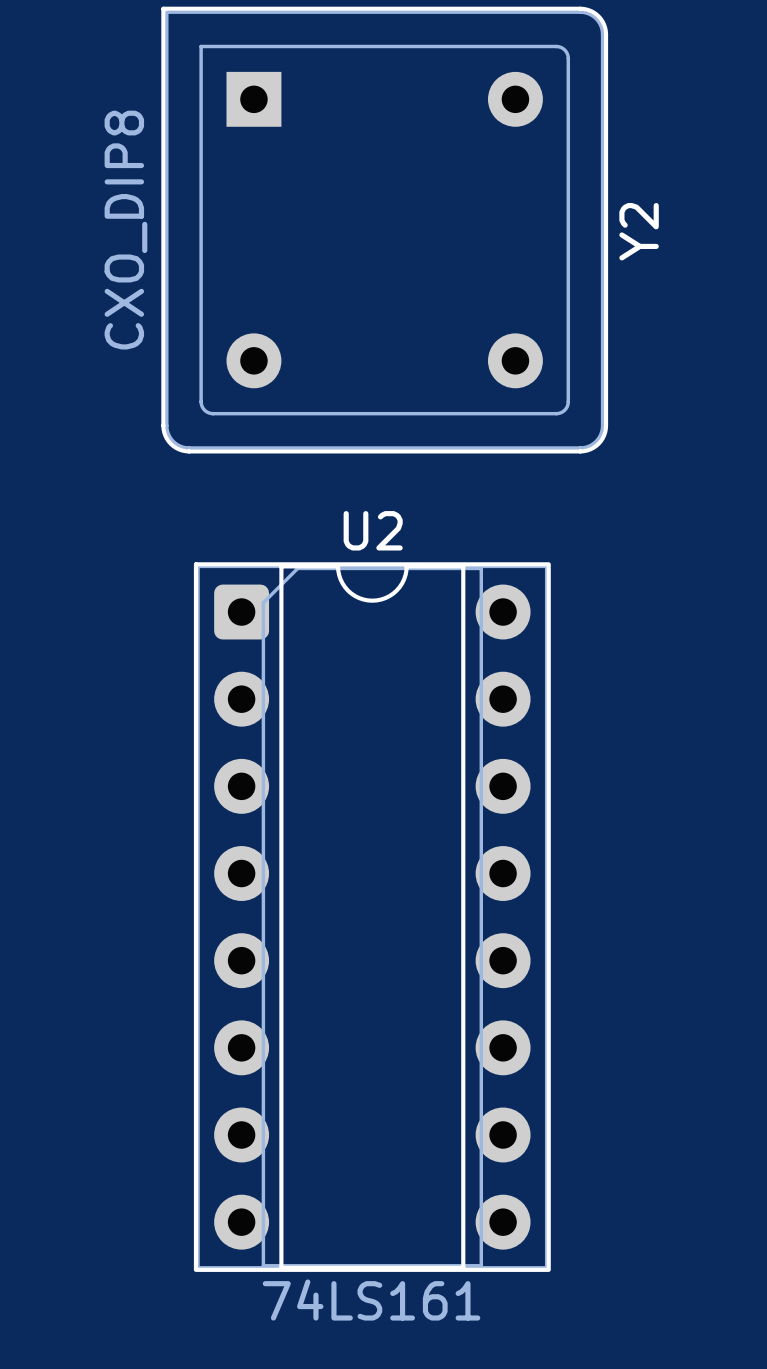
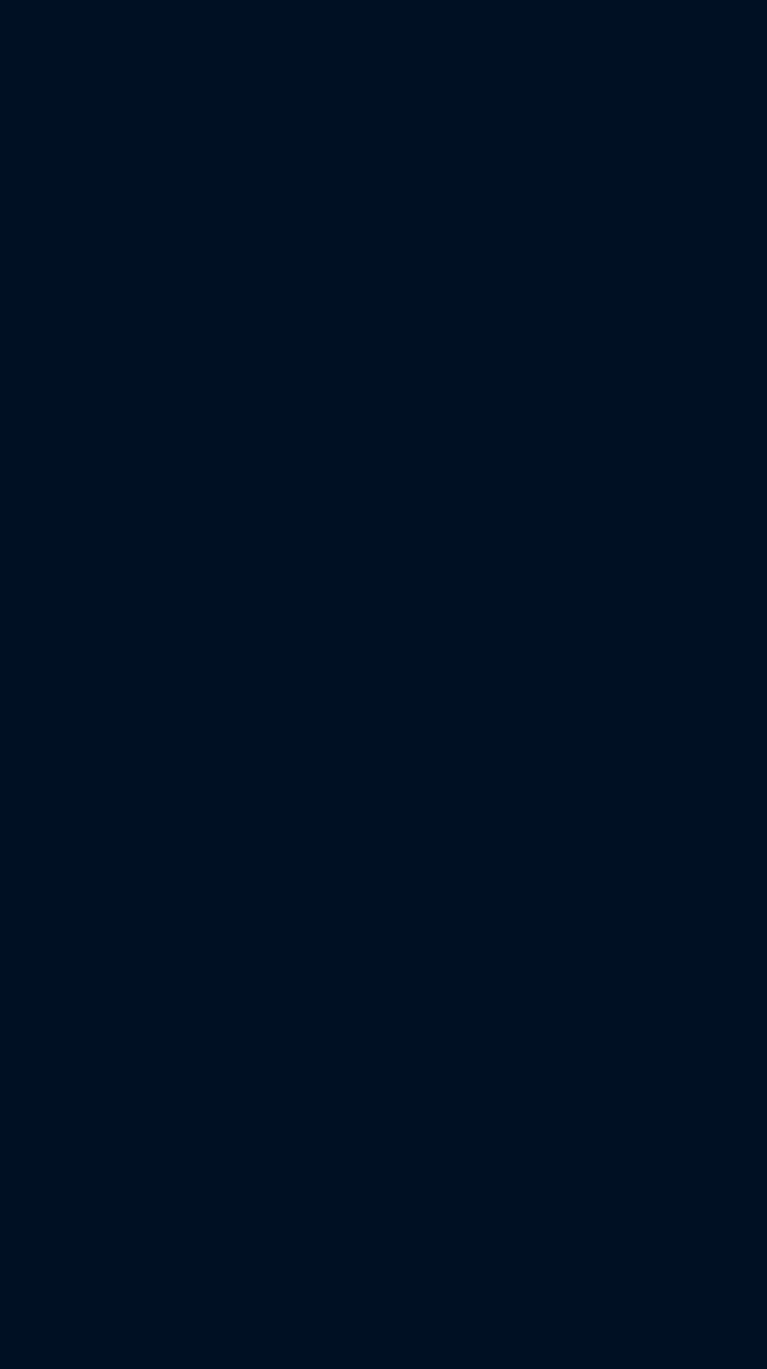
Y2: CXO_DIP8 (384, 230) -> none
U2: 74LS161 (372, 917) -> none

